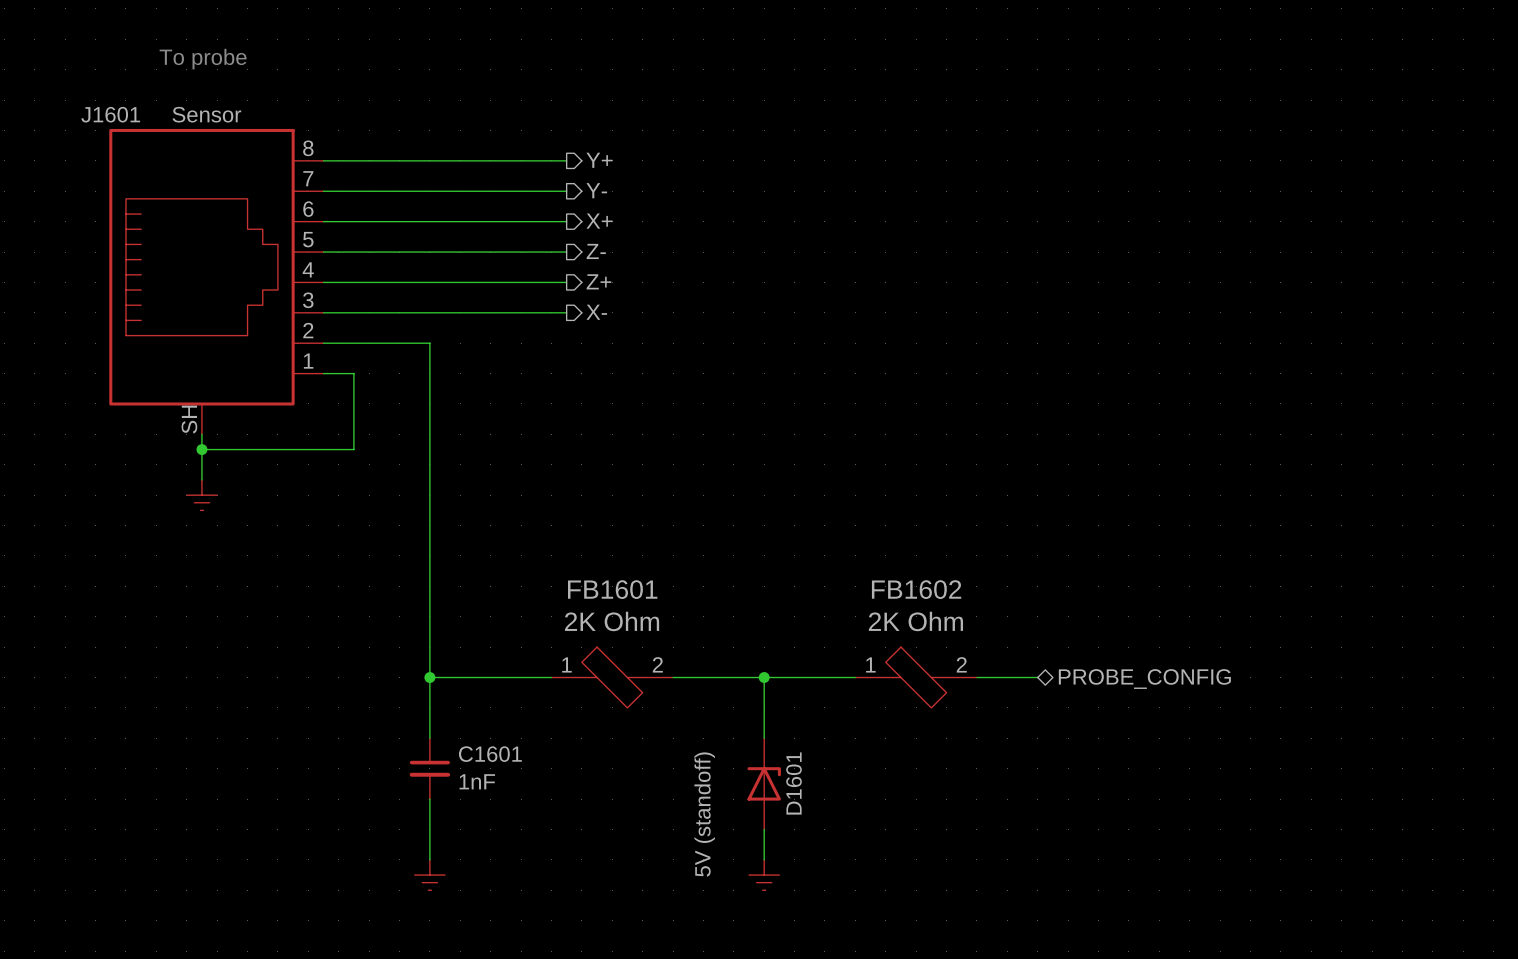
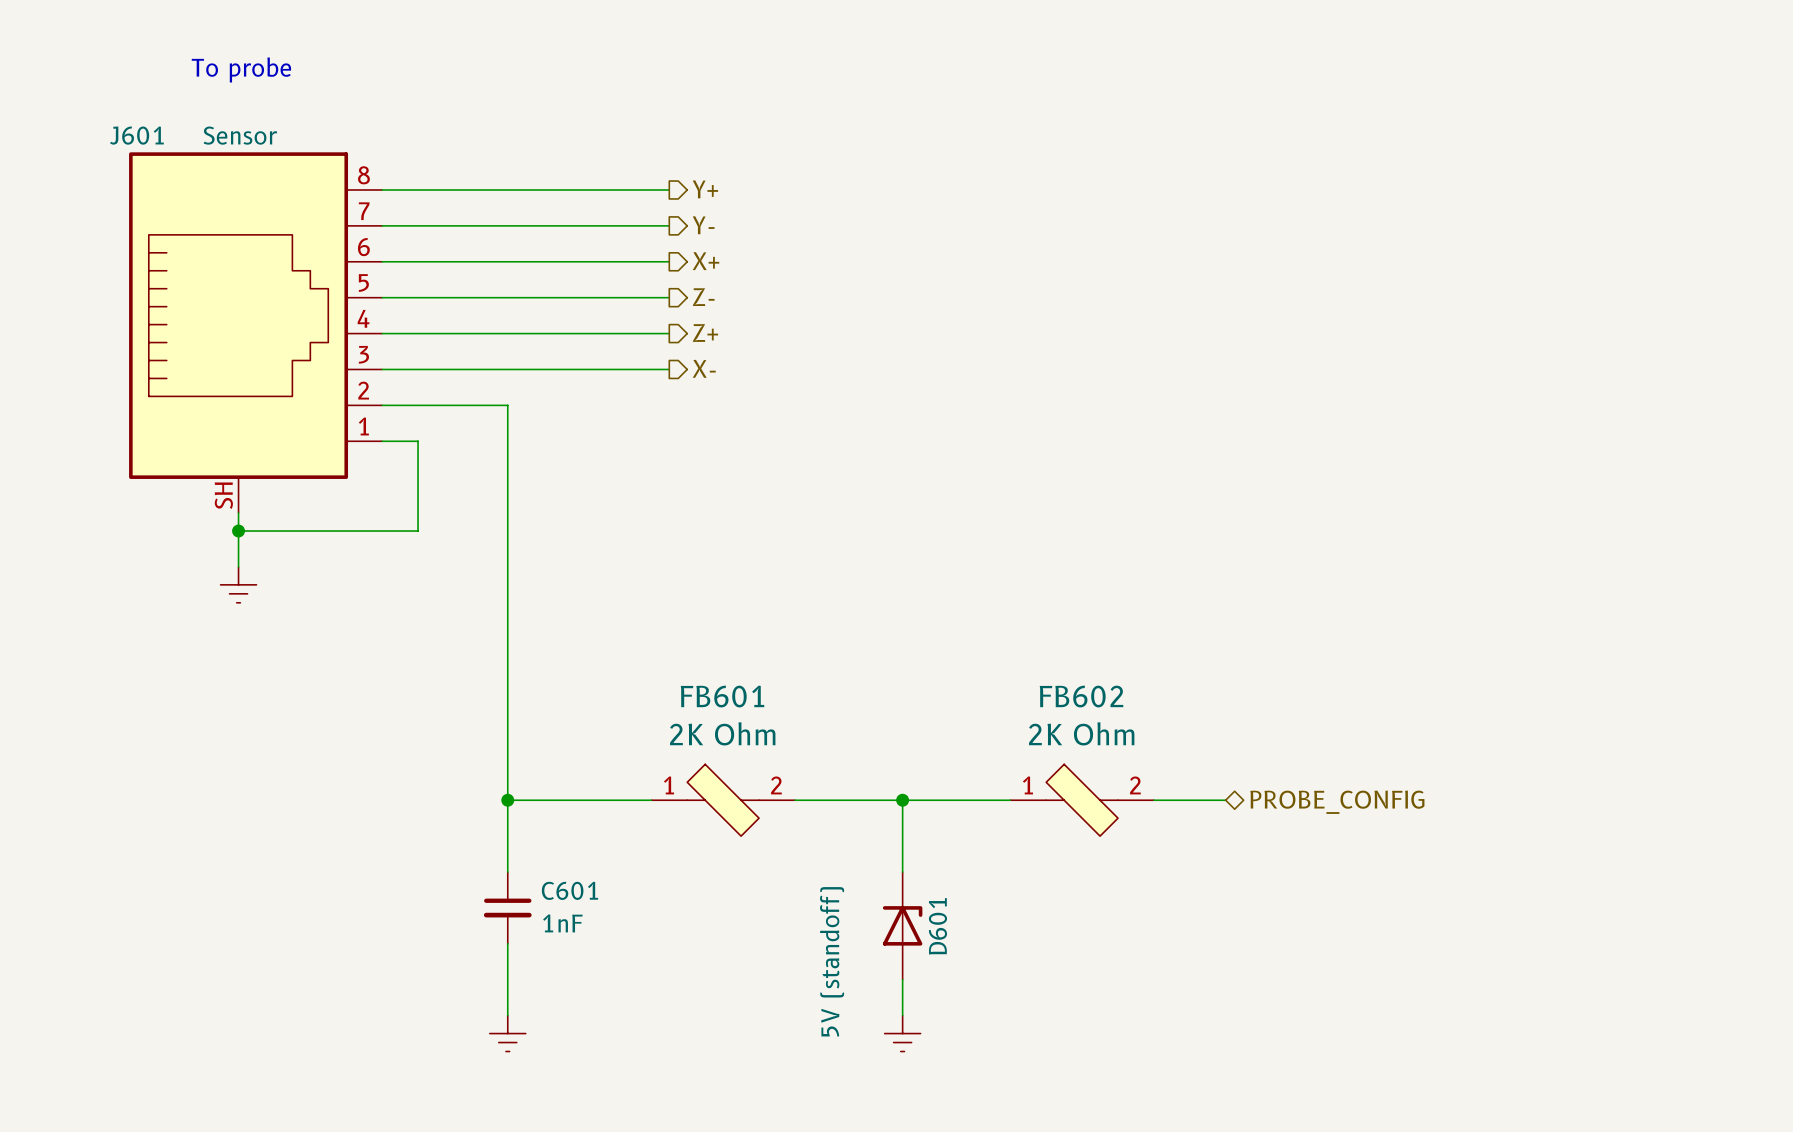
J1601 name: J1601 (110, 114) -> J601 (136, 135)
FB1601 name: FB1601 (612, 589) -> FB601 (722, 696)
FB1602 name: FB1602 (916, 589) -> FB602 (1081, 696)
C1601 name: C1601 (490, 754) -> C601 (569, 890)
D1601 name: D1601 (794, 783) -> D601 (937, 926)

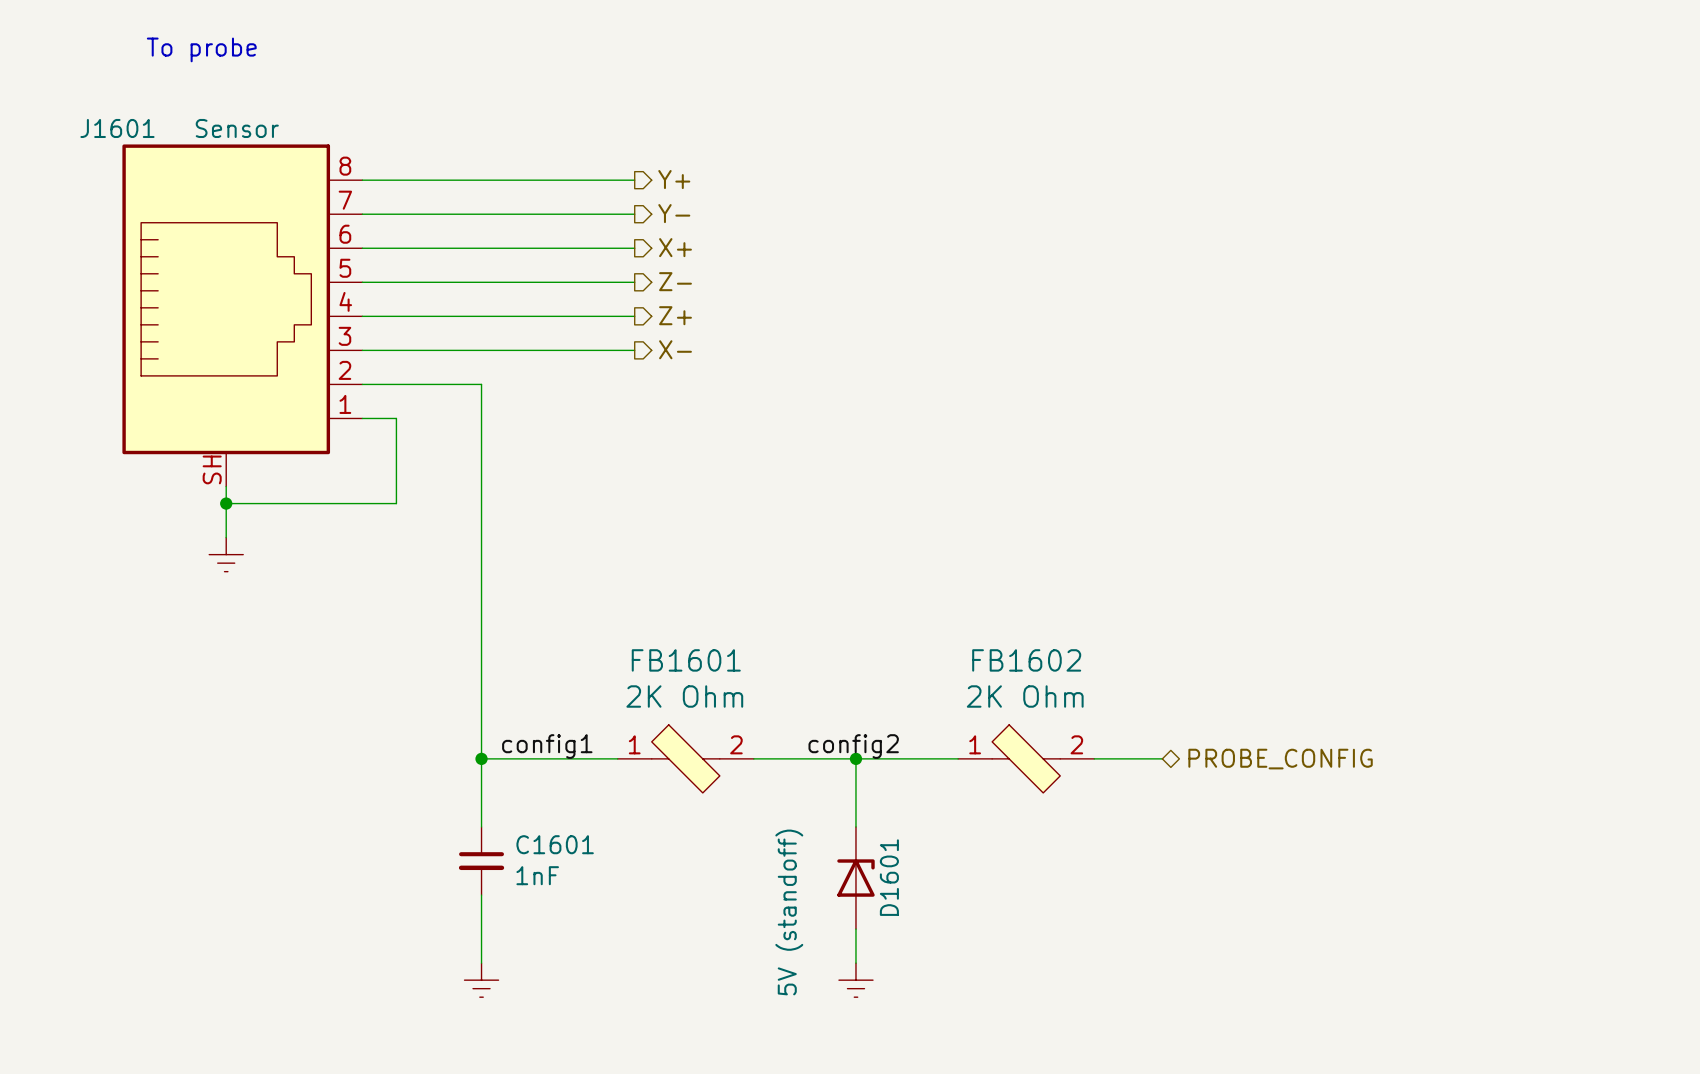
text position: To probe (241, 69) -> To probe (201, 49)
J601 name: J601 (136, 135) -> J1601 (117, 128)
FB601 name: FB601 (722, 696) -> FB1601 (686, 660)
FB602 name: FB602 (1081, 696) -> FB1602 (1026, 660)
label: none -> config1 (547, 746)
label: none -> config2 (853, 746)
C601 name: C601 (569, 890) -> C1601 (555, 844)
D601 name: D601 (937, 926) -> D1601 (889, 877)

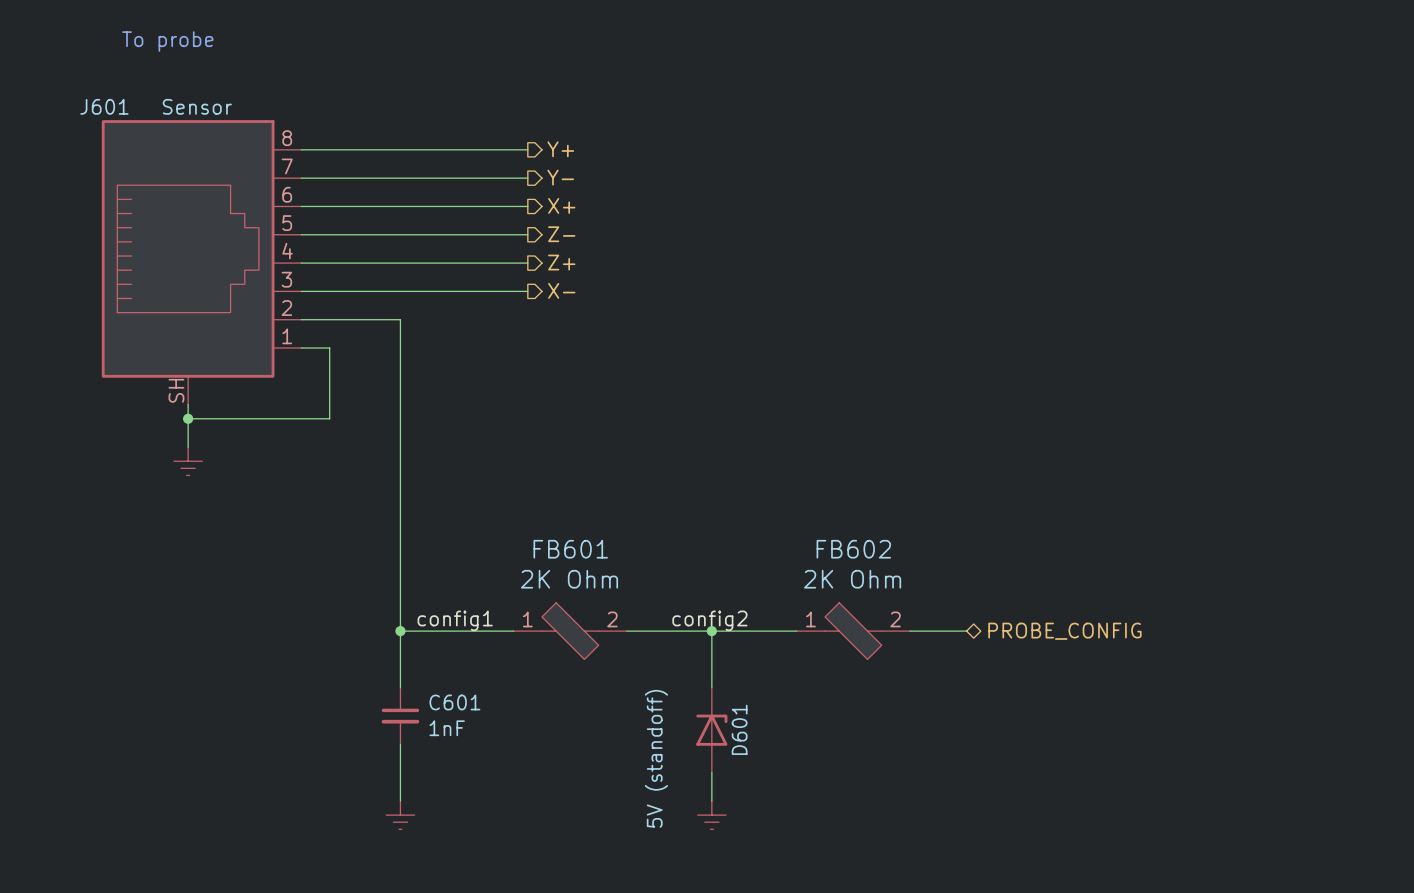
J1601 name: J1601 (117, 128) -> J601 (104, 106)
FB1601 name: FB1601 (686, 660) -> FB601 (570, 549)
FB1602 name: FB1602 (1026, 660) -> FB602 (853, 549)
C1601 name: C1601 (555, 844) -> C601 (454, 702)
D1601 name: D1601 (889, 877) -> D601 (739, 729)

